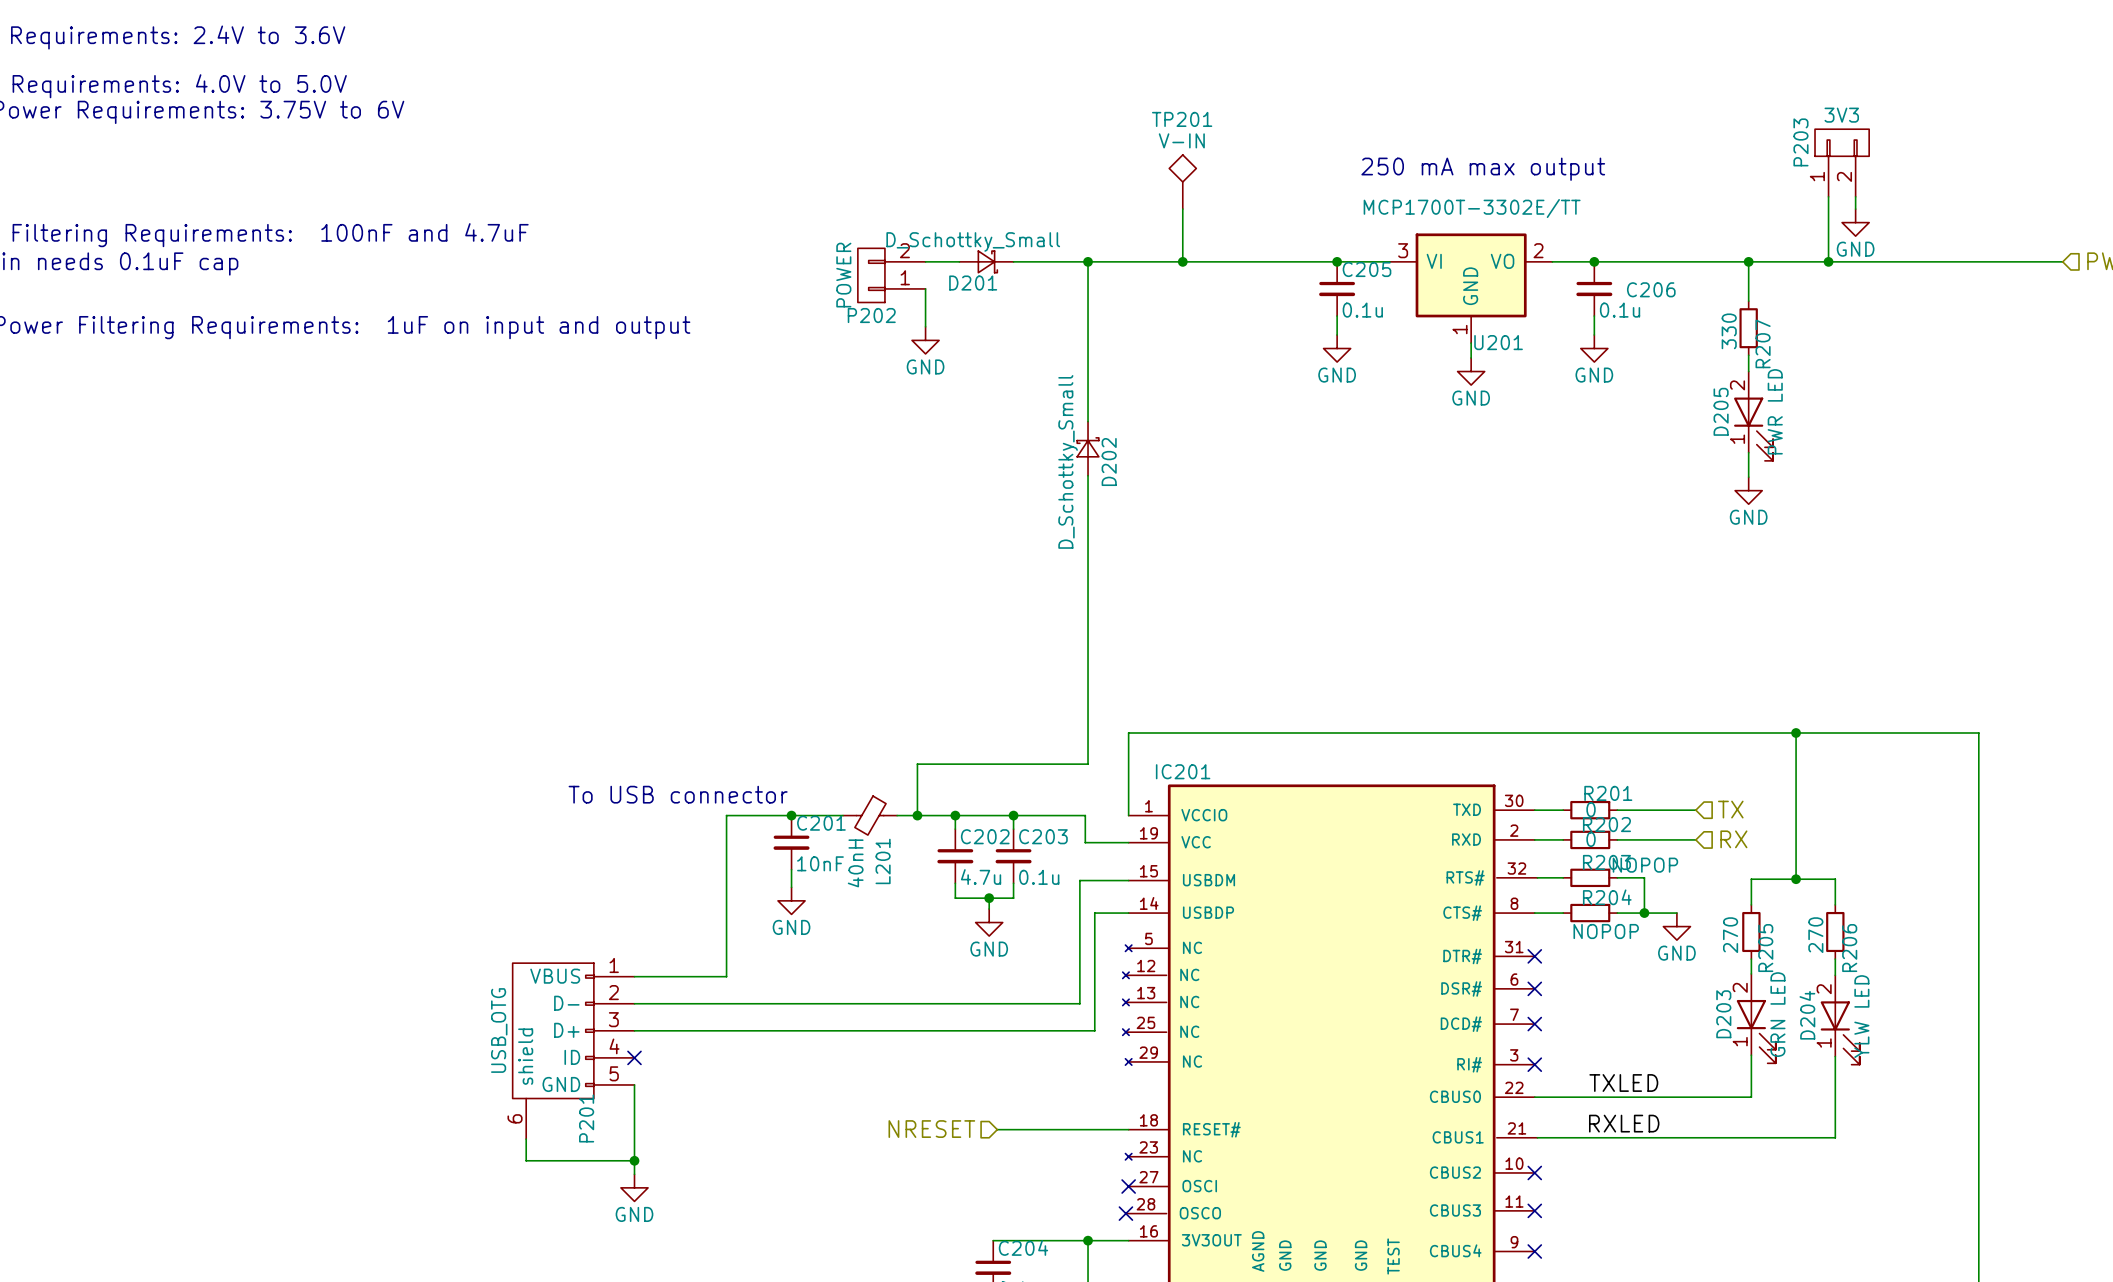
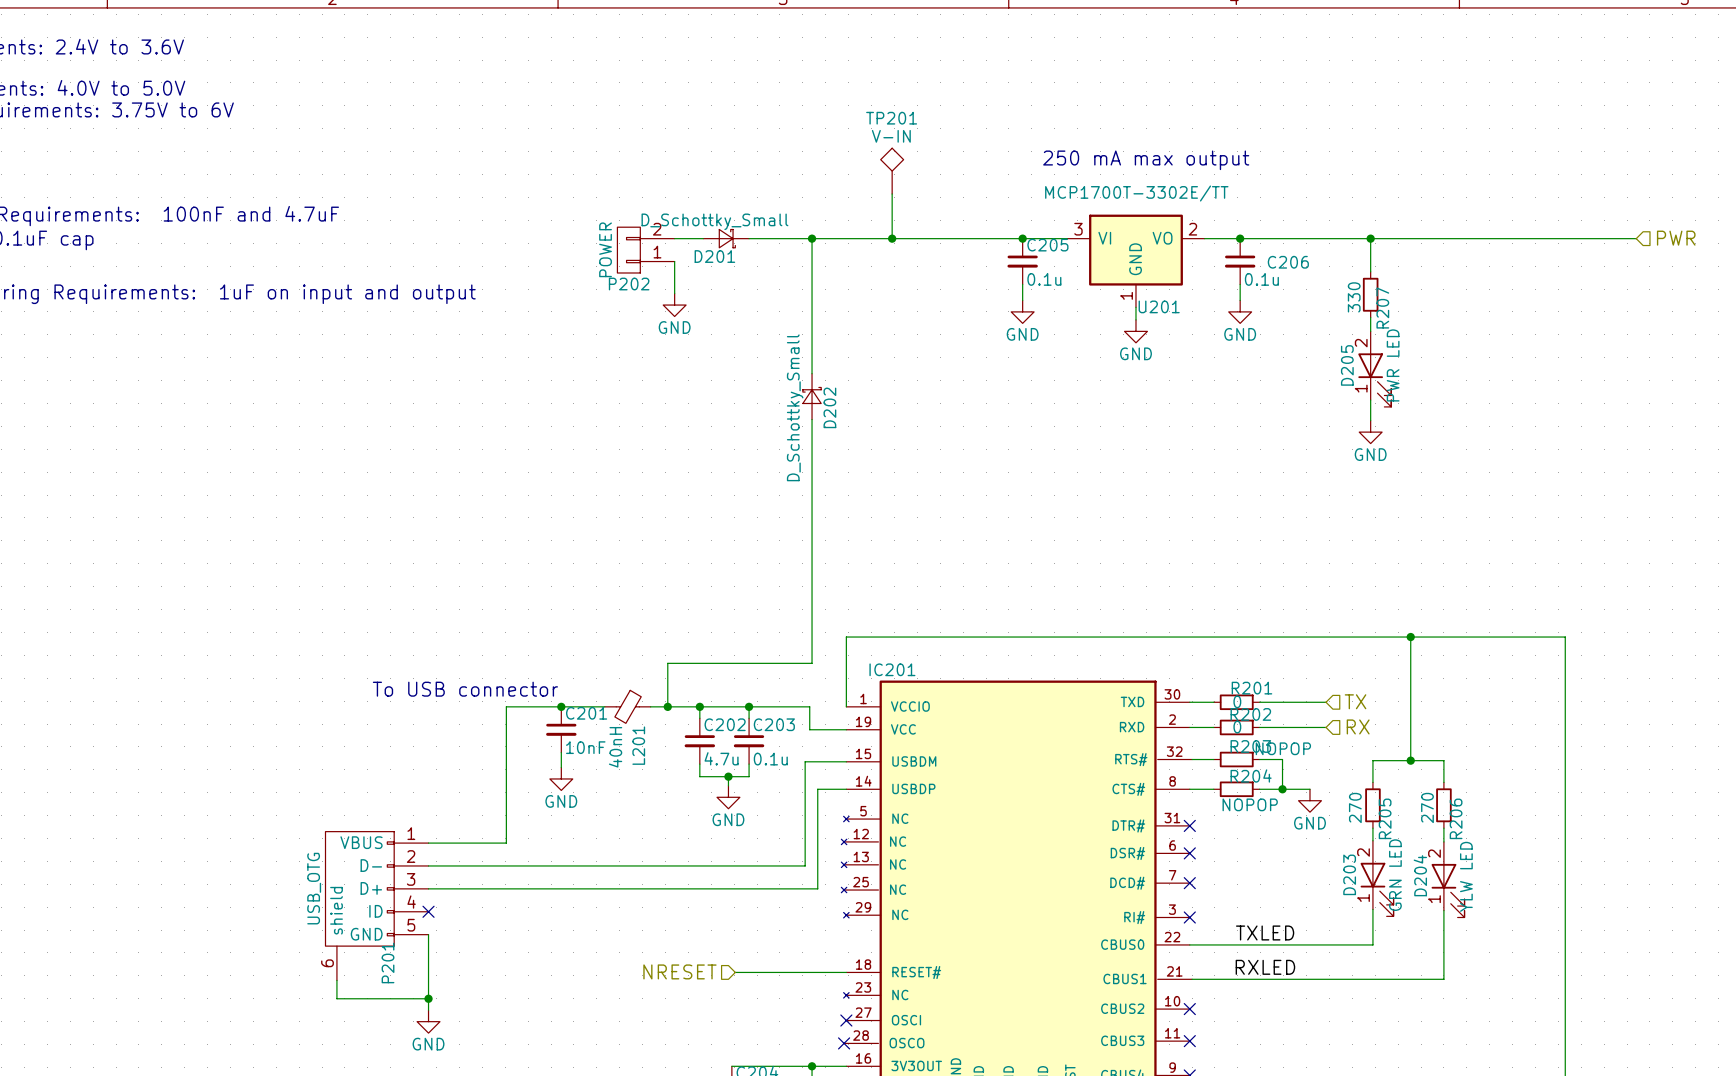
P203: 3V3 (1842, 163) -> none
wire: (1828, 196) (1828, 261) -> none
wire: (1855, 196) (1855, 209) -> none
power symbol: GND (1855, 222) -> none
junction: (1828, 261) -> none

